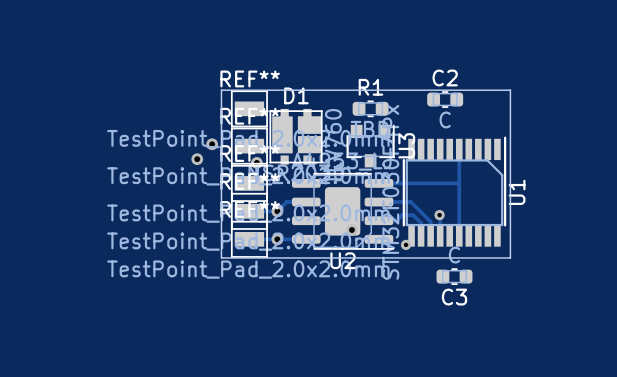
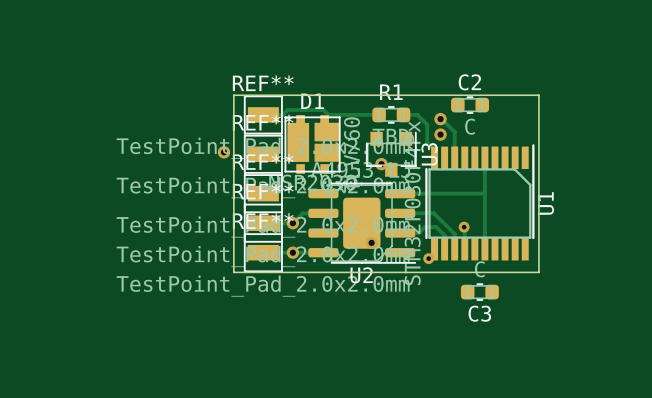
track: none -> (263, 114) (282, 114) (287, 109) (323, 109) (328, 114) (379, 114)
track: none -> (403, 114) (417, 114) (427, 124) (427, 142) (434, 150) (434, 157)
track: none -> (440, 119) (454, 132) (454, 157)
via: none -> (440, 119)
via: none -> (440, 134)
via: none -> (381, 164)
via: (197, 159) -> none
via: (256, 162) -> none

